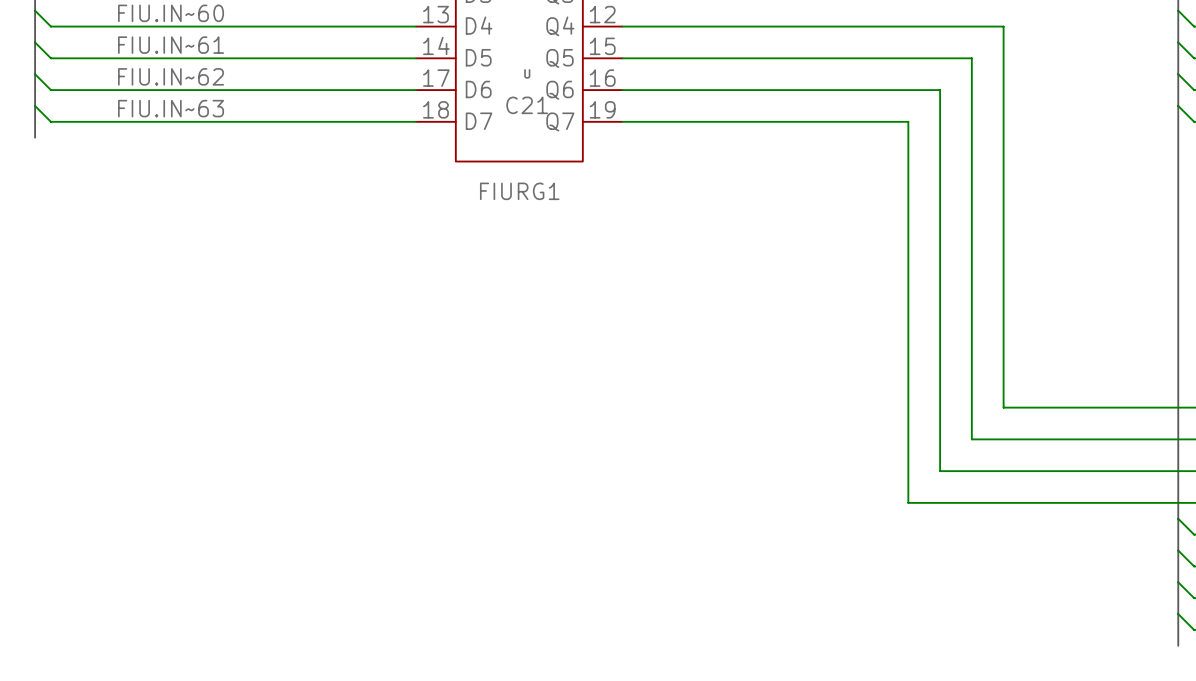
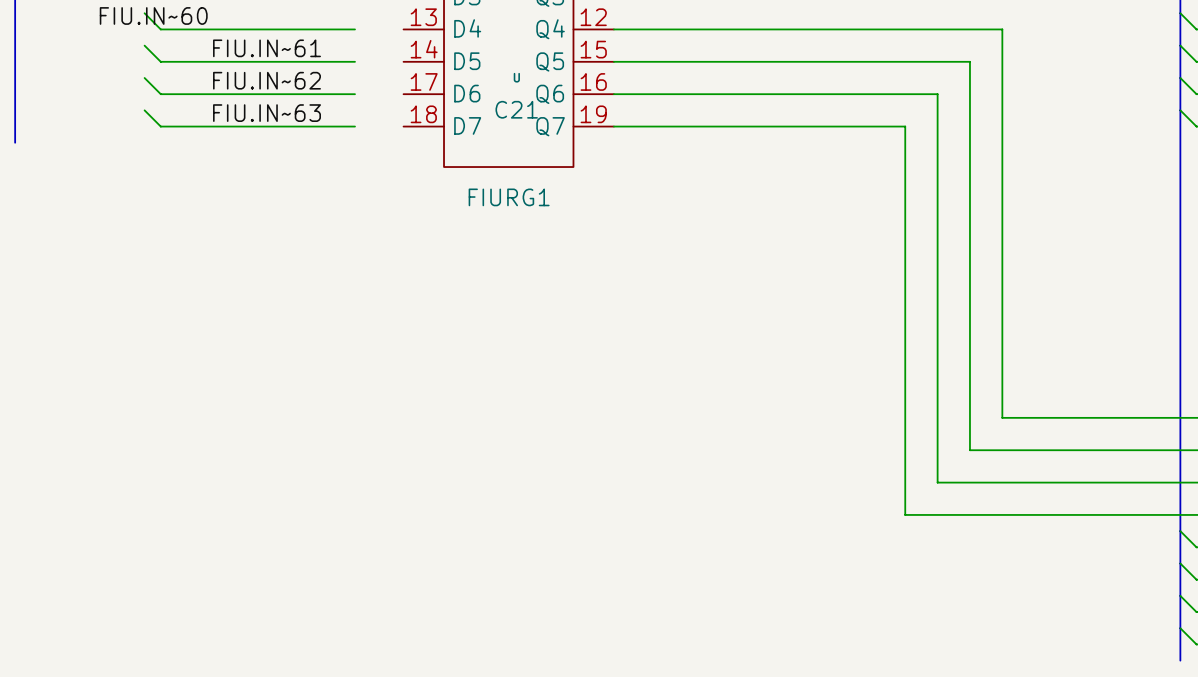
wire: (35, 10) (50, 26) (177, 26) -> (144, 13) (160, 29)
wire: (368, 26) (416, 26) -> none
wire: (35, 42) (50, 58) (177, 58) -> (144, 45) (160, 61)
label position: FIU.IN~61 (171, 45) -> FIU.IN~61 (267, 48)
wire: (368, 58) (416, 58) -> none
wire: (35, 74) (50, 90) (177, 90) -> (144, 78) (160, 94)
label position: FIU.IN~62 (171, 76) -> FIU.IN~62 (267, 80)
wire: (368, 90) (416, 90) -> none
wire: (35, 105) (50, 121) (177, 121) -> (144, 110) (160, 126)
label position: FIU.IN~63 (171, 108) -> FIU.IN~63 (267, 113)
wire: (368, 121) (416, 121) -> none

